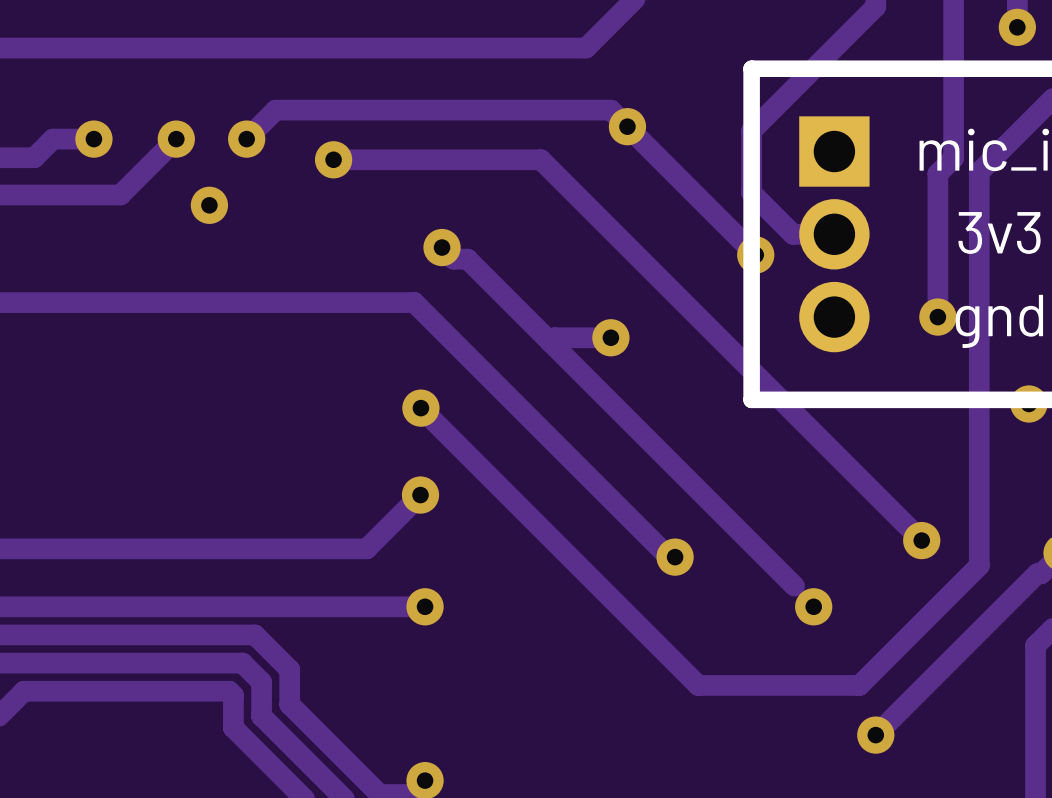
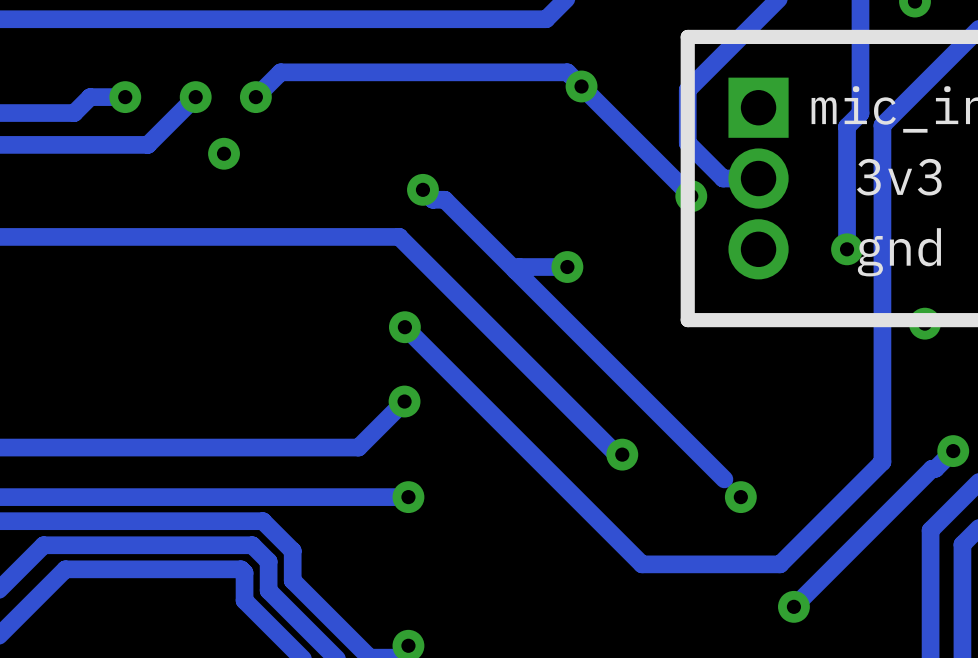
track: (333, 159) (540, 159) (921, 540) -> none
via: (333, 159) -> none
via: (921, 540) -> none

